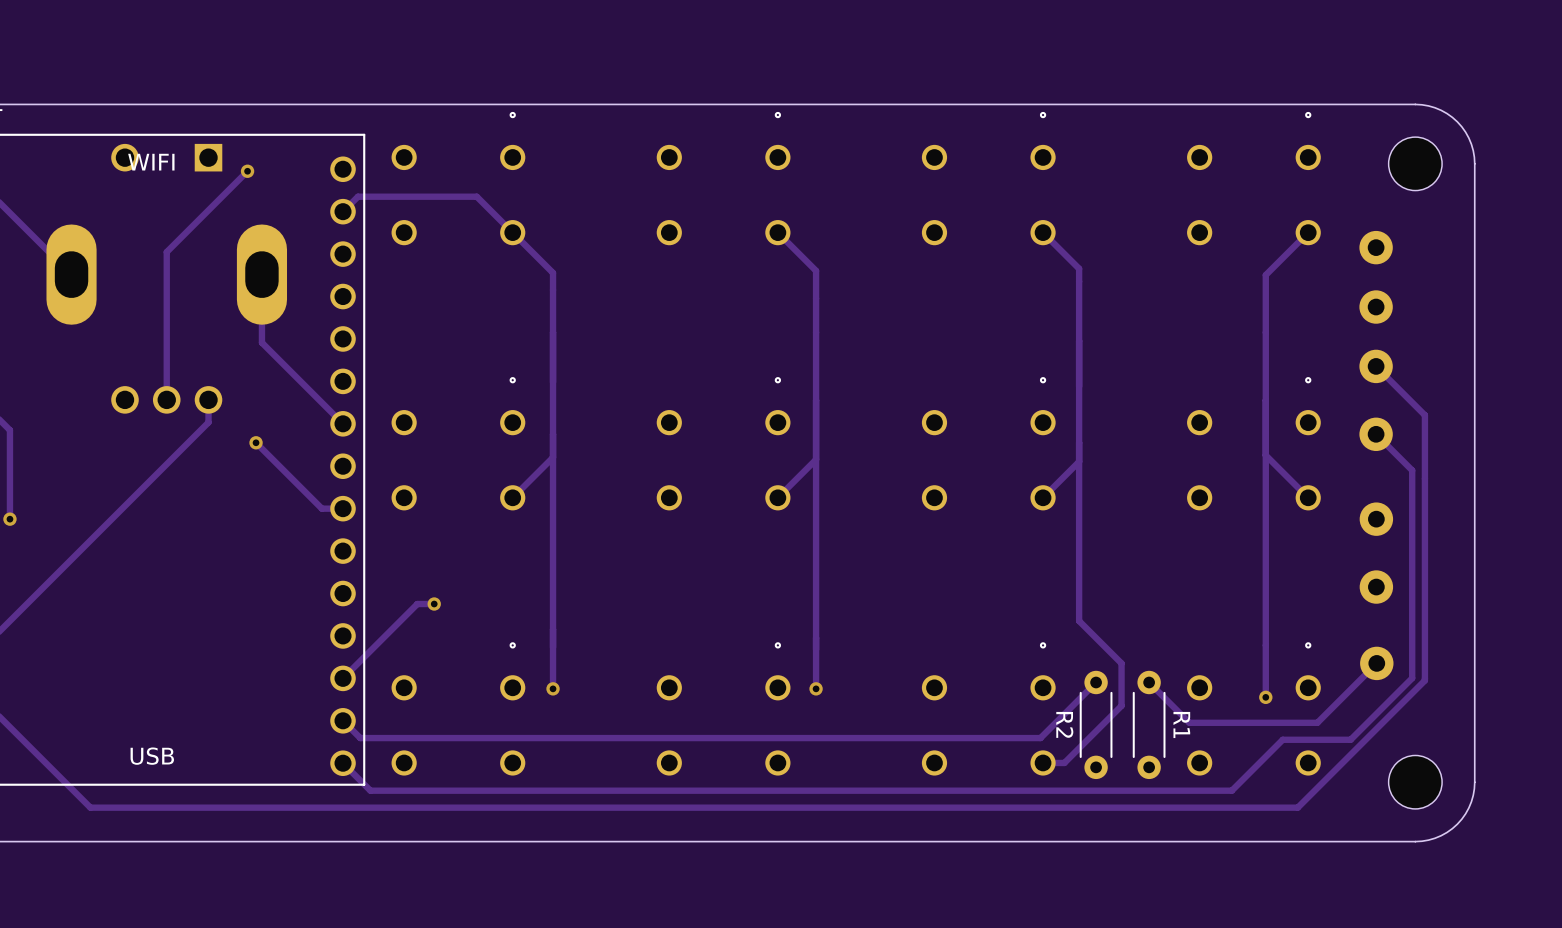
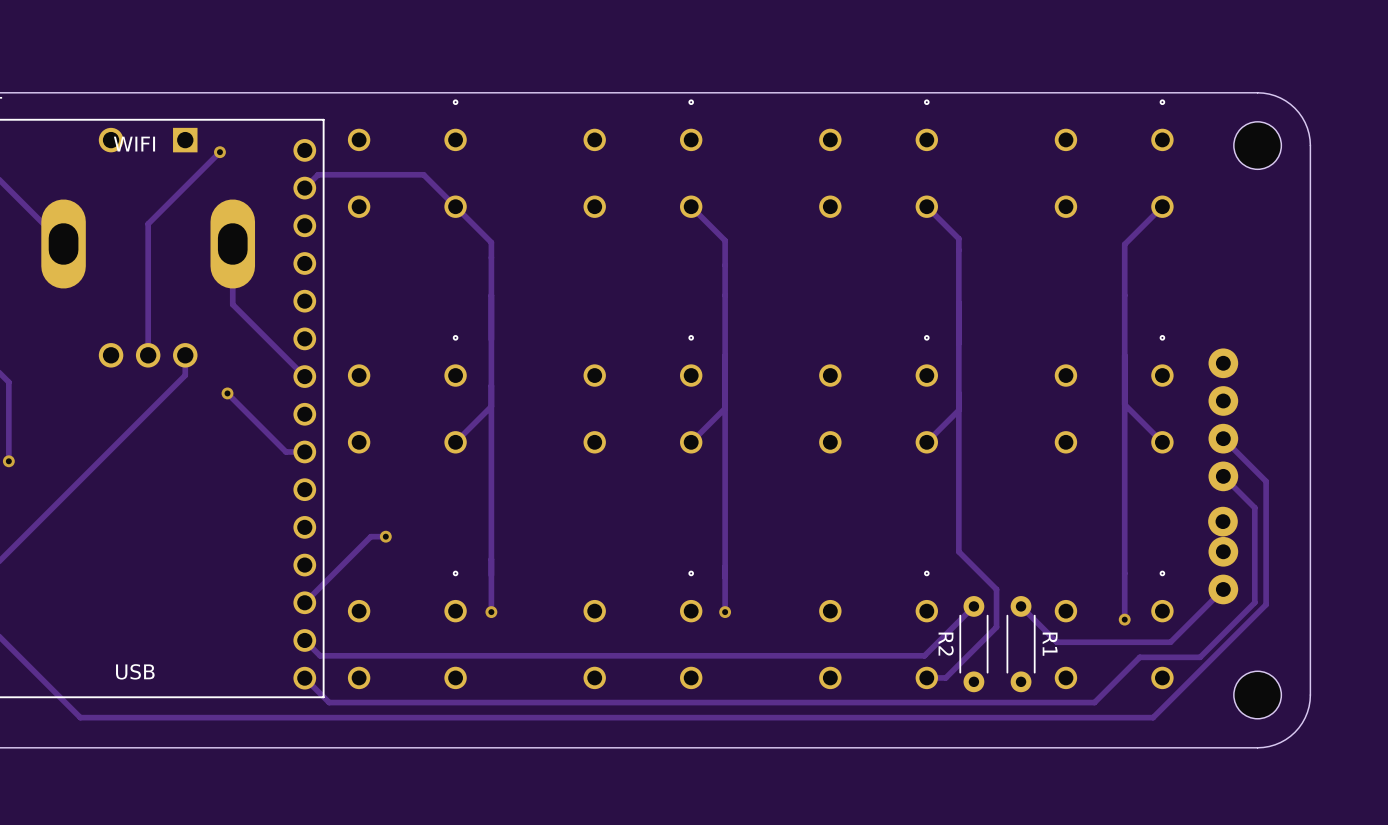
part: (1376, 247) -> none
part: (1376, 307) -> none
track: (1376, 366) (1424, 415) (1424, 541) -> (1223, 438) (1266, 481)
part: (1376, 366) -> none
part: none -> (1223, 363)
track: (1376, 434) (1412, 470) (1412, 571) -> (1223, 476) (1254, 507)
part: (1376, 434) -> none
part: none -> (1223, 400)
part: none -> (1223, 438)
part: (1376, 519) -> none
part: none -> (1223, 476)
part: none -> (1223, 551)

